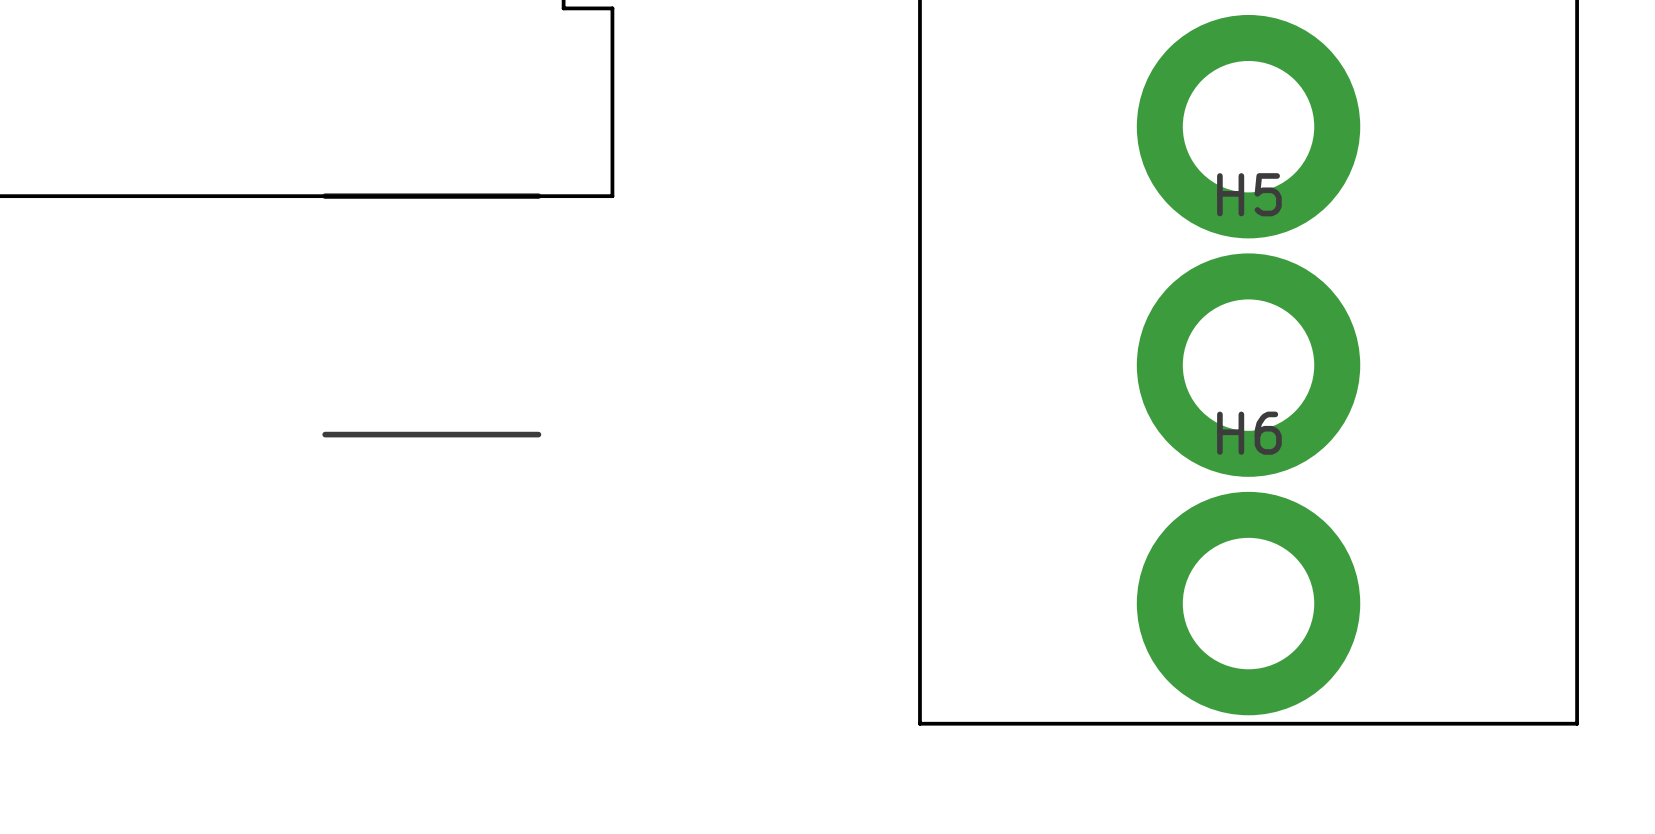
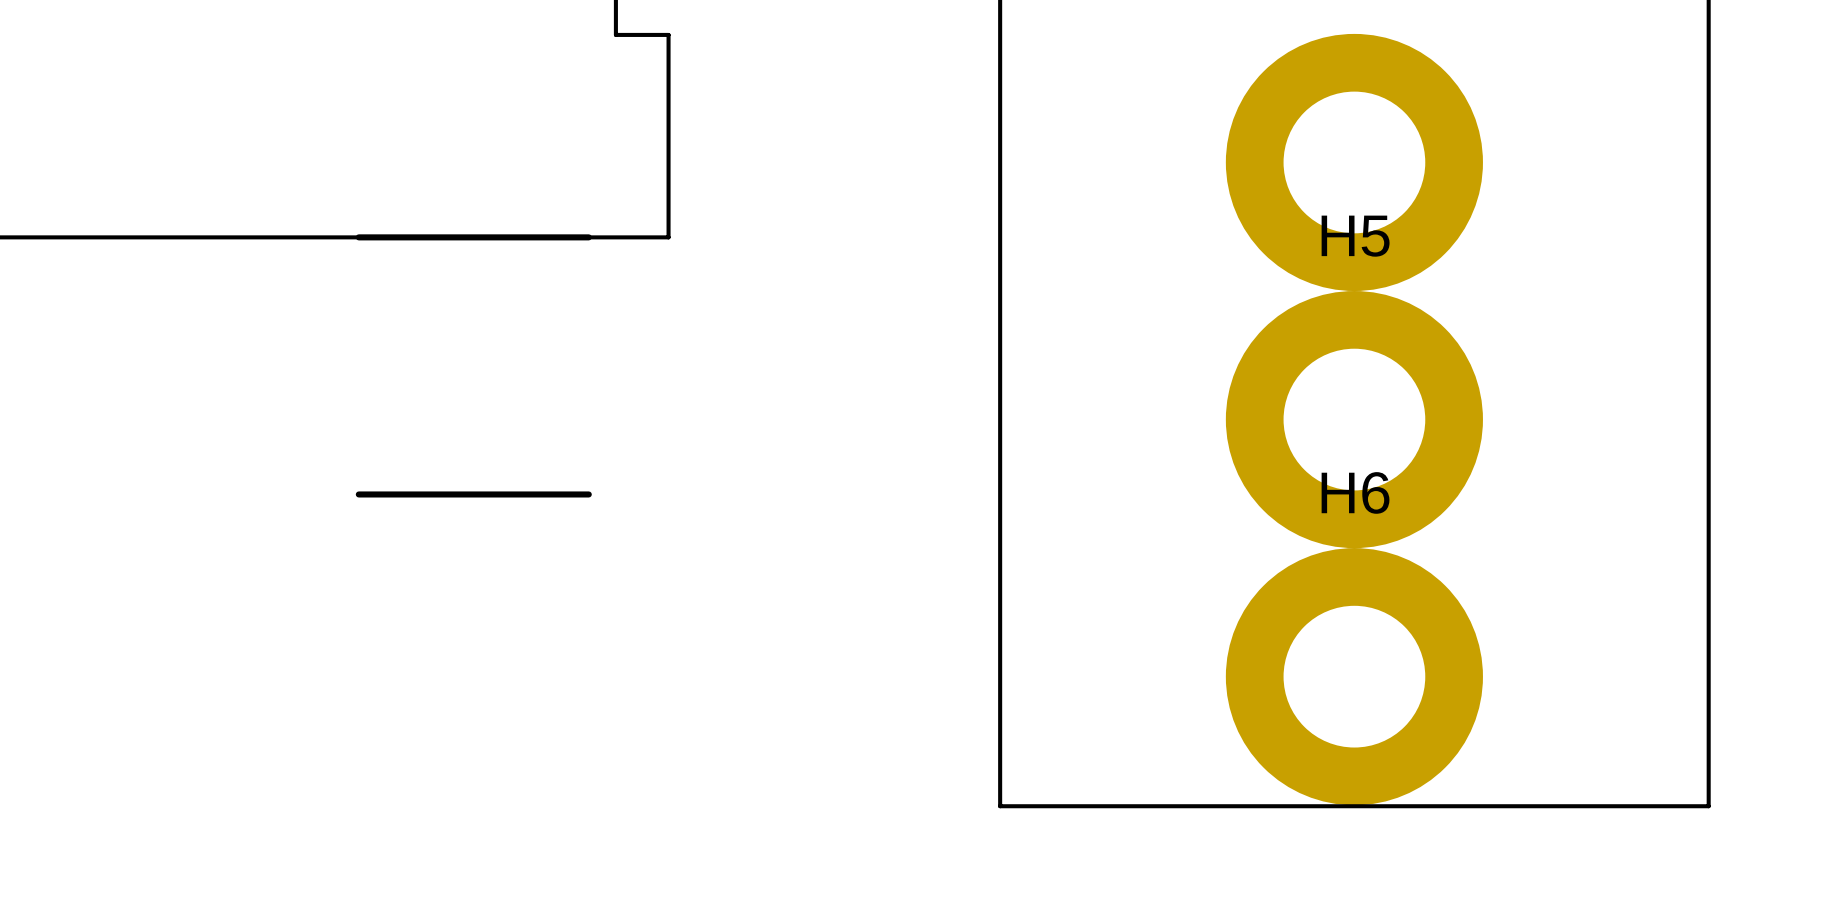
part footprint: [1136, 14, 1361, 239] -> [1225, 33, 1483, 292]
H5 footprint: [1136, 253, 1361, 477] -> [1225, 291, 1483, 549]
H6 footprint: [1136, 491, 1361, 716] -> [1225, 548, 1483, 806]

